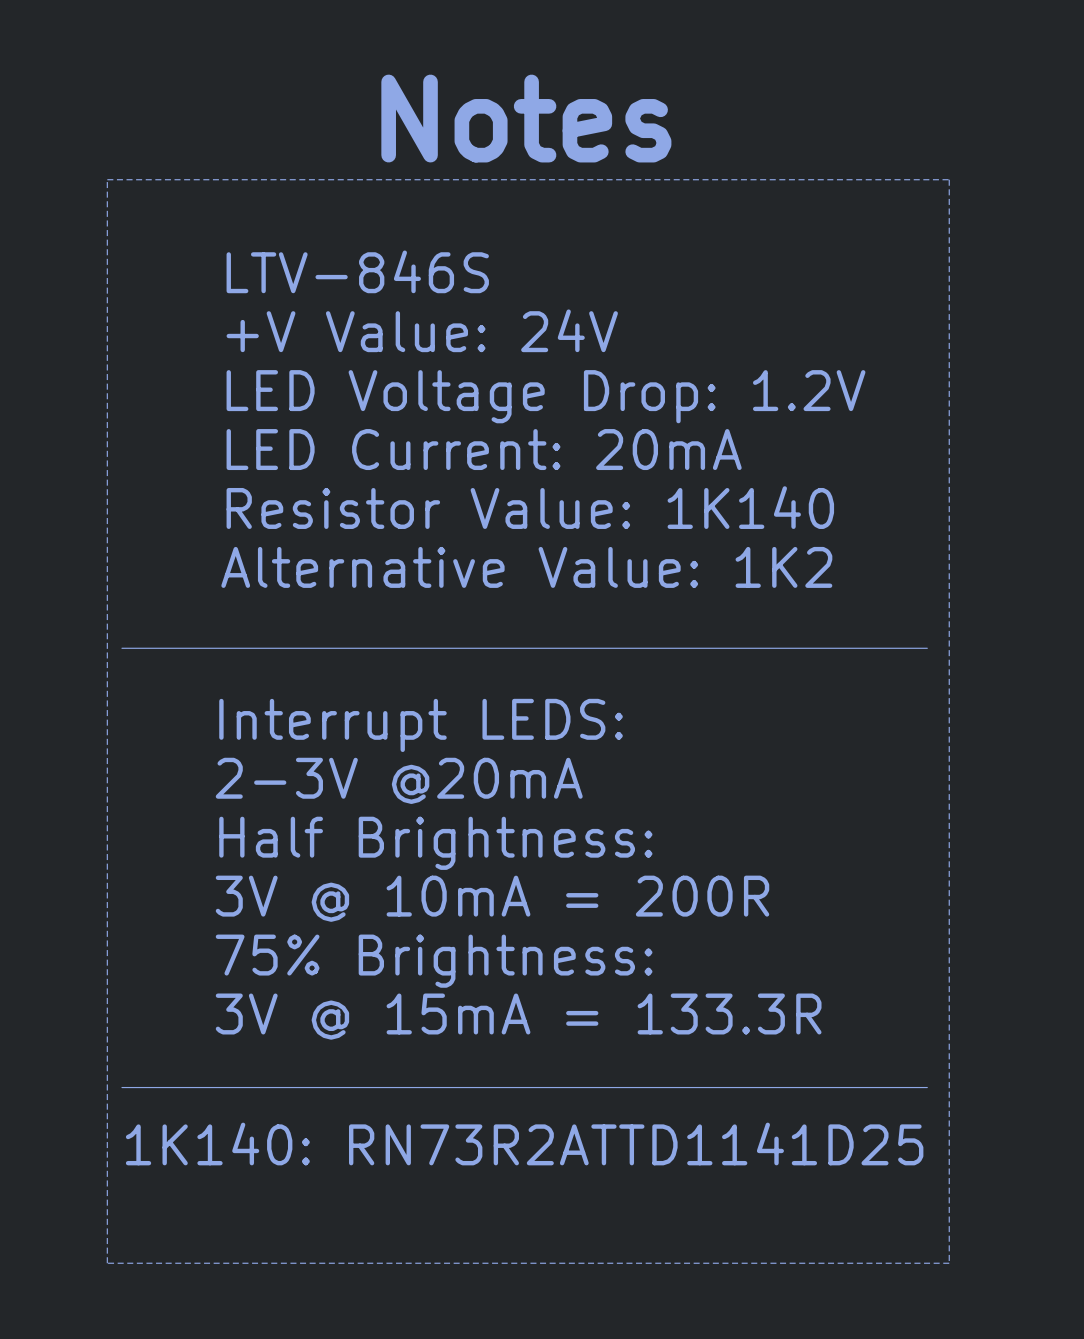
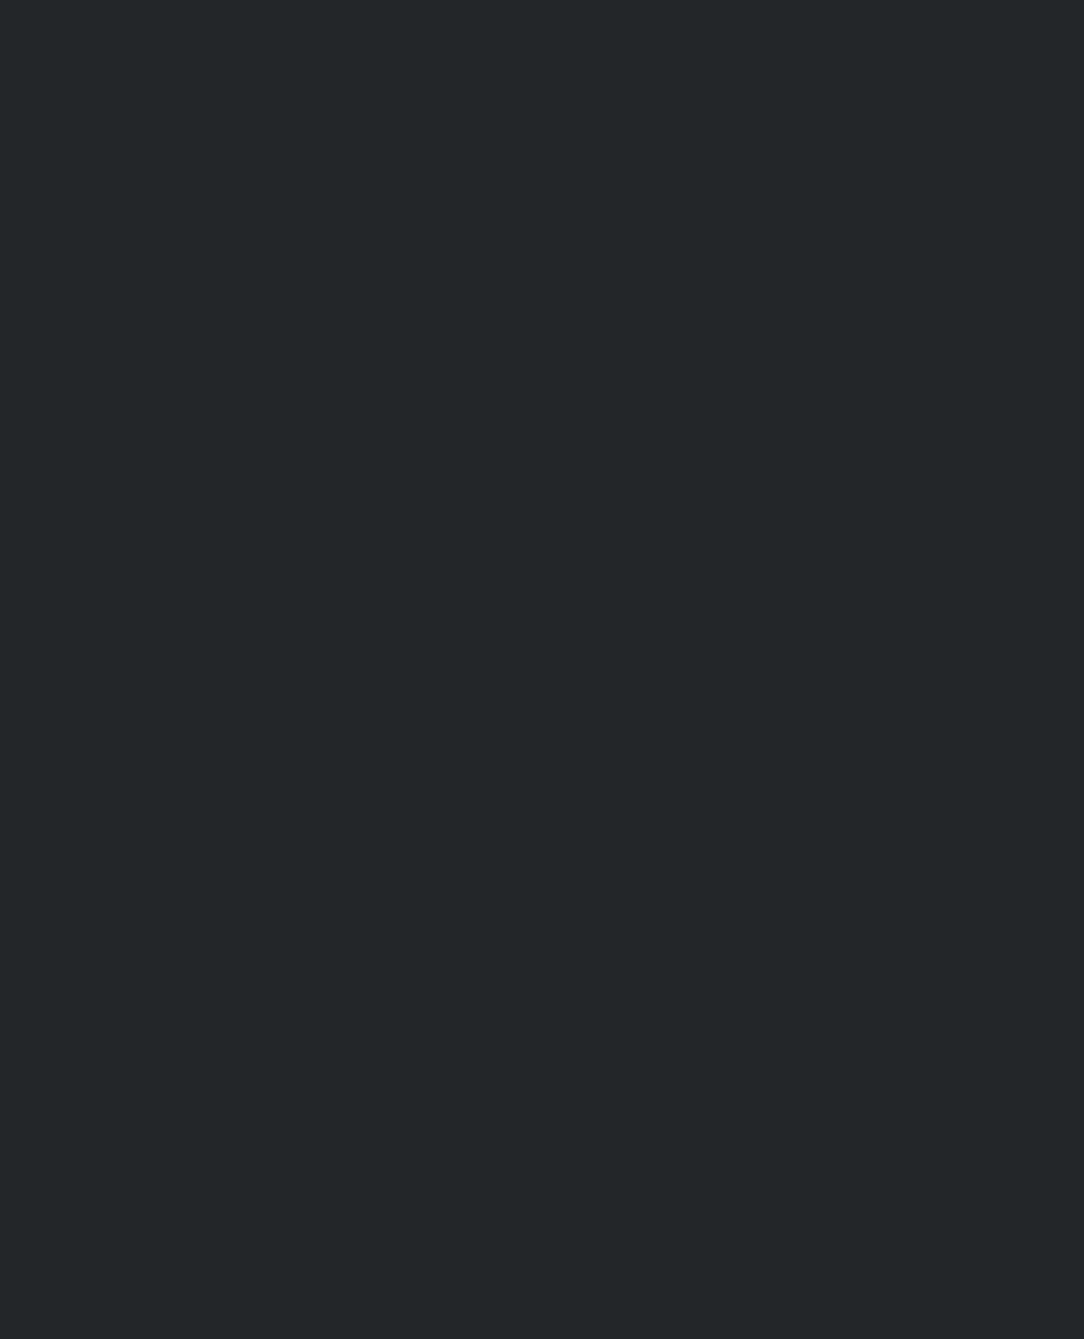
text: Notes (526, 118) -> none
line: (107, 179) (949, 179) (949, 1263) (107, 1263) (107, 179) -> none
text: LTV-846S (357, 271) -> none
text: +V Value: 24V (422, 330) -> none
text: LED Voltage Drop: 1.2V (546, 396) -> none
text: LED Current: 20mA (484, 449) -> none
text: Resistor Value: 1K140 (530, 507) -> none
text: Alternative Value: 1K2 (526, 567) -> none
line: (121, 648) (927, 648) -> none
text: Interrupt LEDS: (421, 725) -> none
text: 2-3V @20mA (399, 780) -> none
text: Half Brightness: (435, 843) -> none
text: 3V @ 10mA = 200R (492, 898) -> none
text: 75% Brightness: (434, 961) -> none
text: 3V @ 15mA = 133.3R (518, 1016) -> none
line: (121, 1087) (927, 1087) -> none
text: 1K140: RN73R2ATTD1141D25 (524, 1143) -> none

